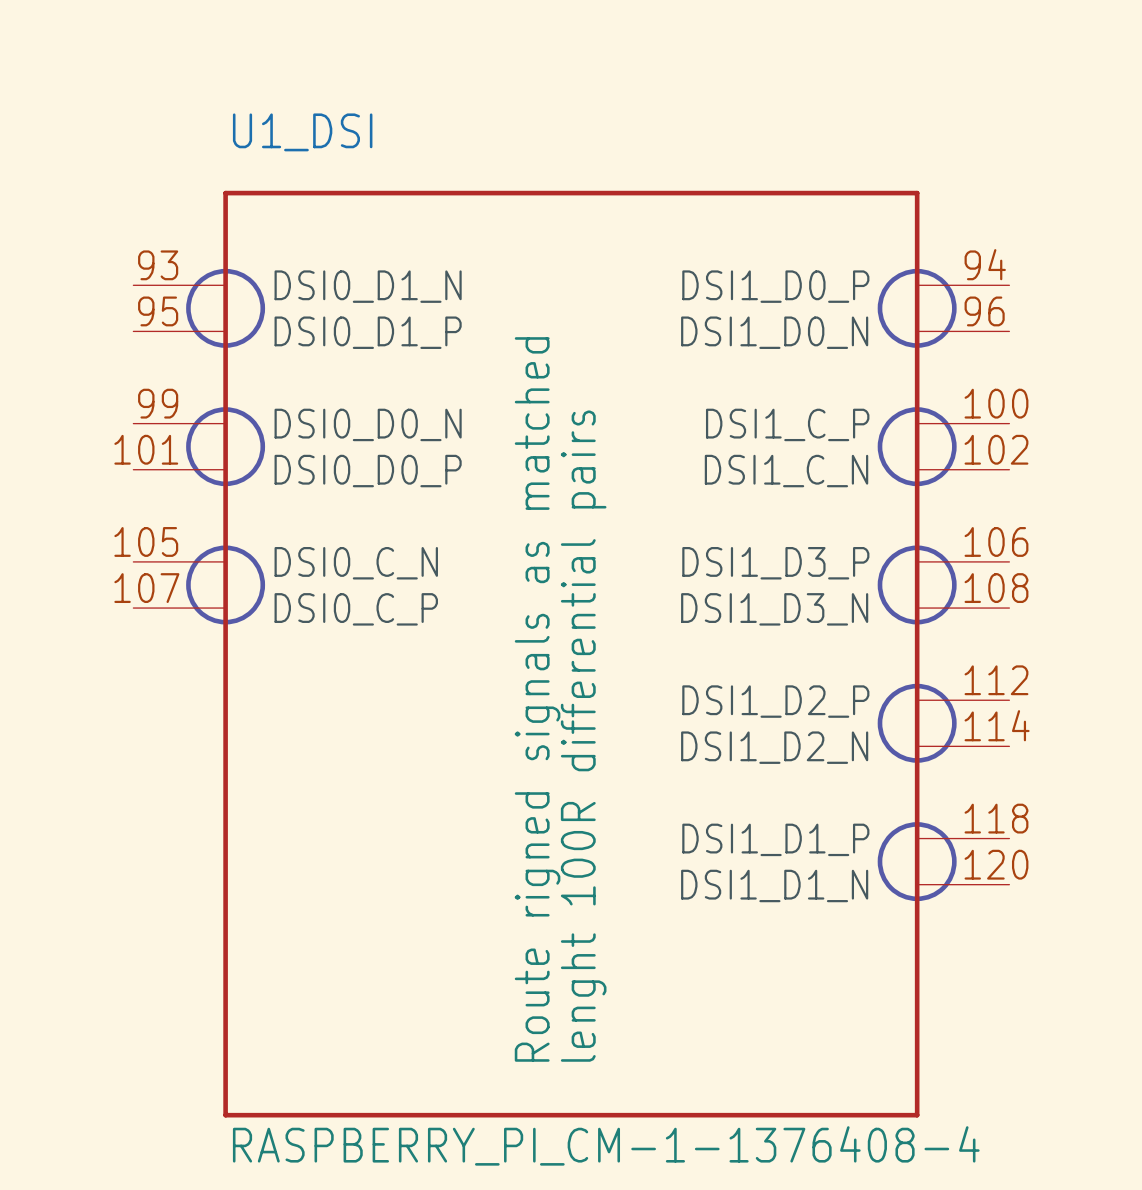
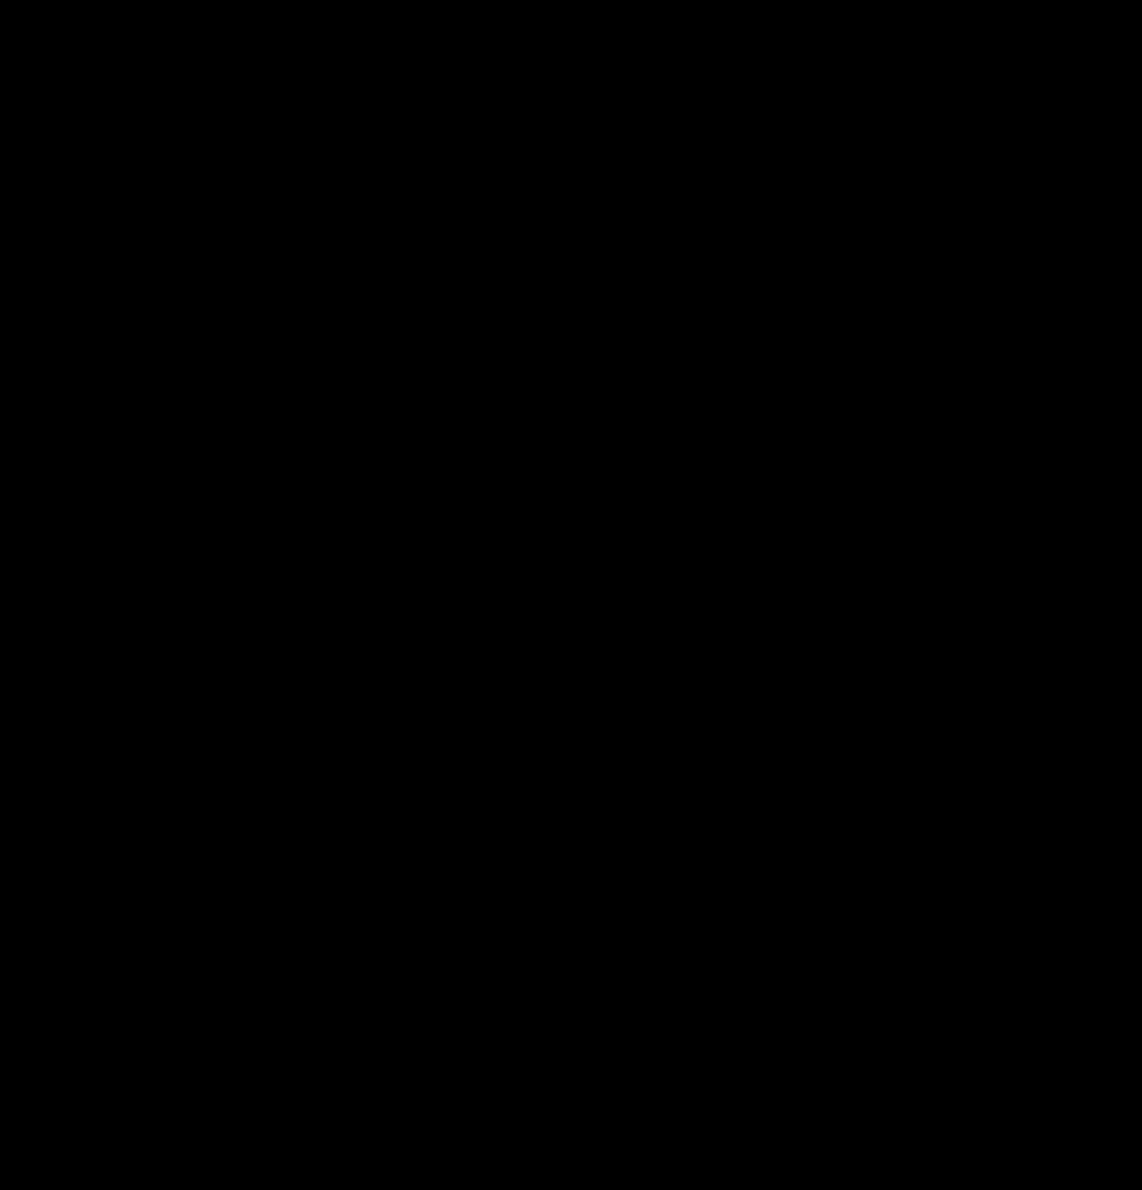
U1_DSI: RASPBERRY_PI_CM-1-1376408-4 (571, 654) -> none

